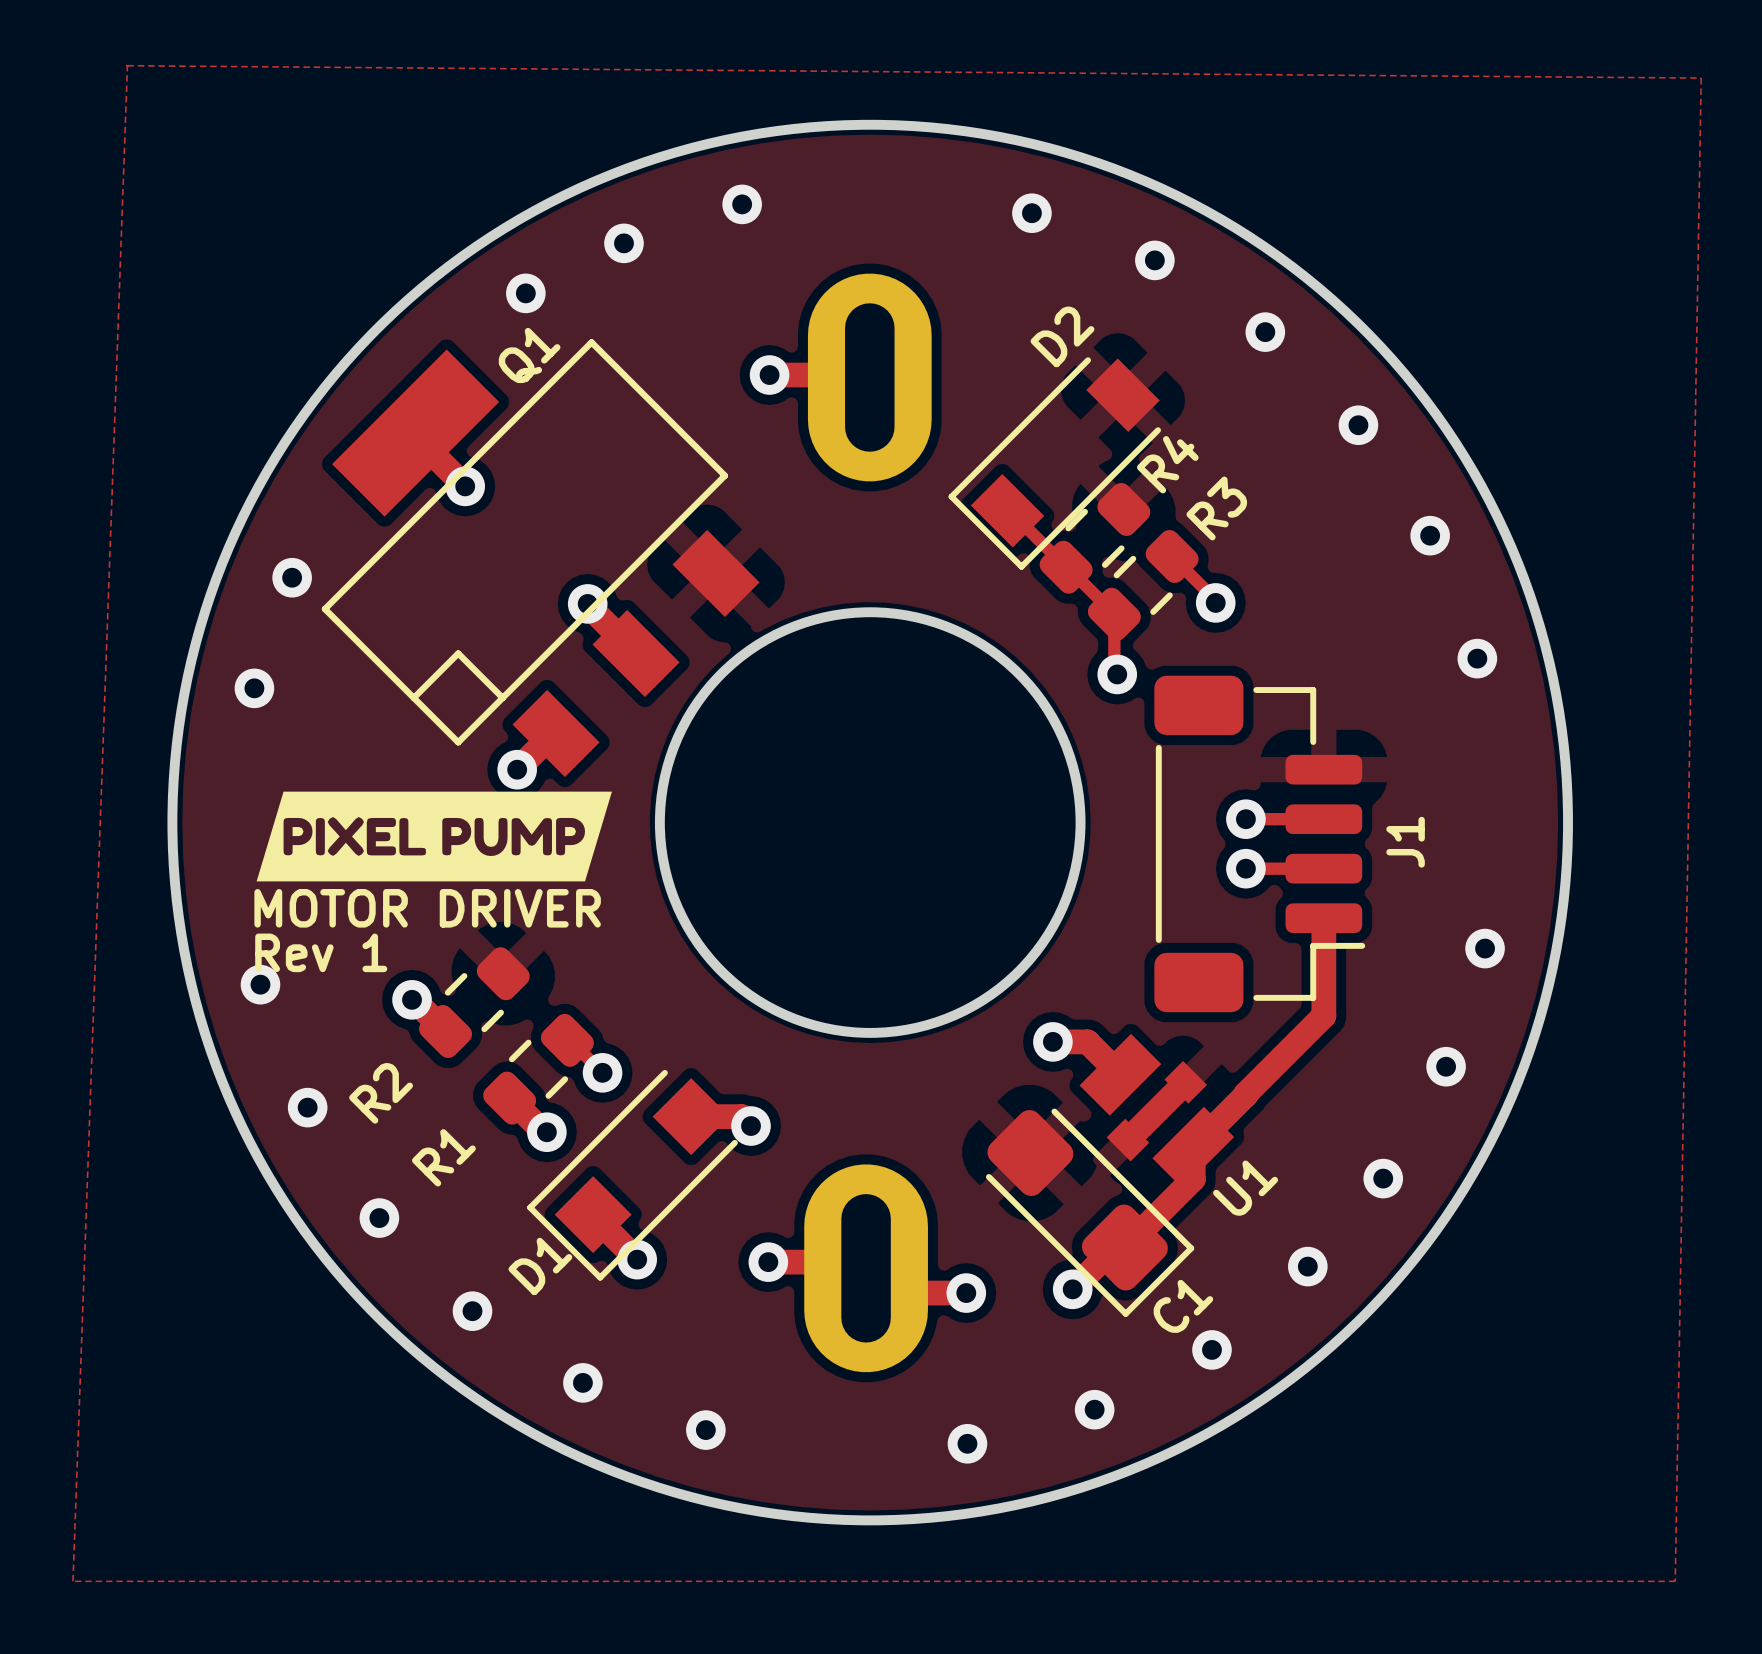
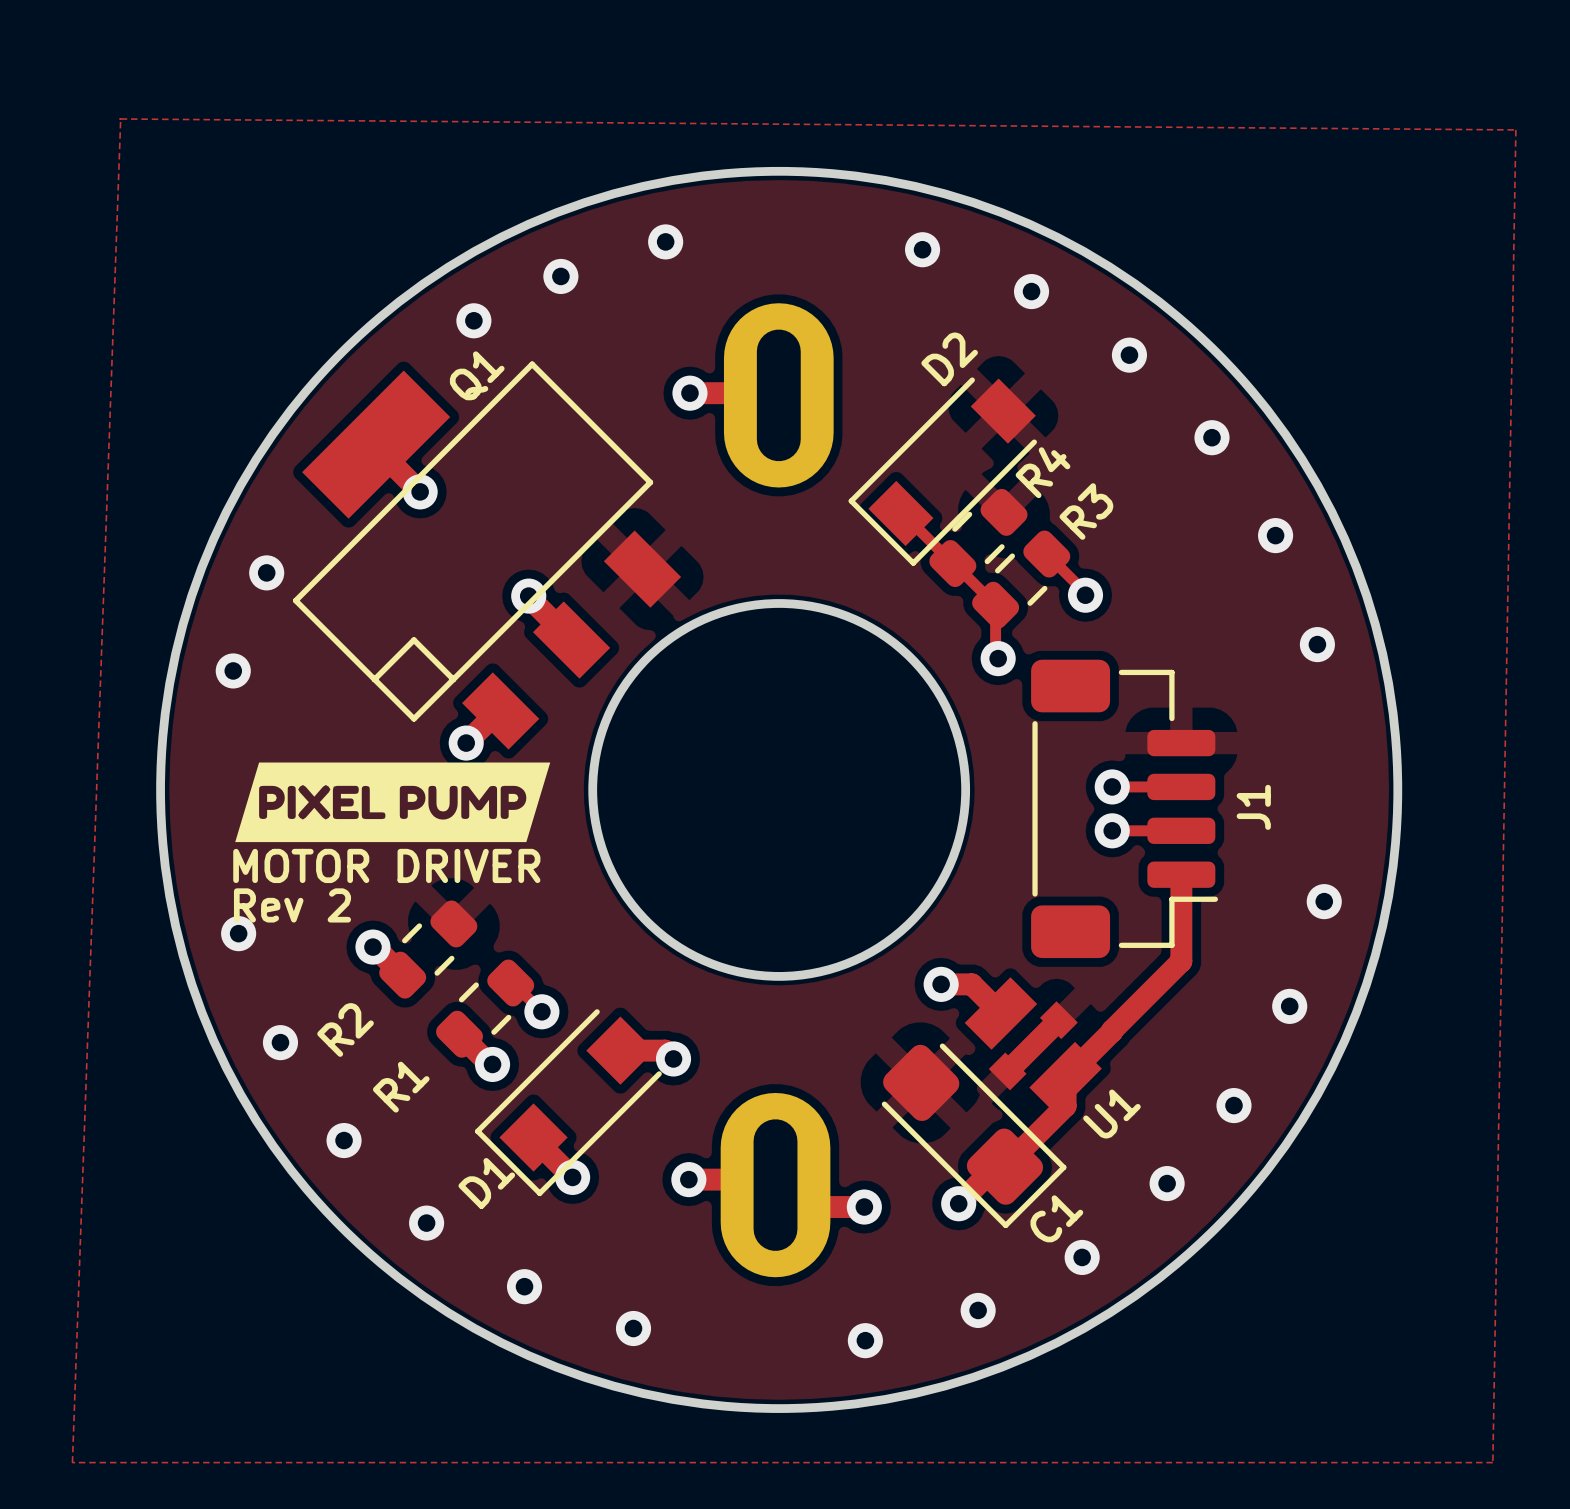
text: Rev 1 (321, 952) -> Rev 2 (292, 905)

